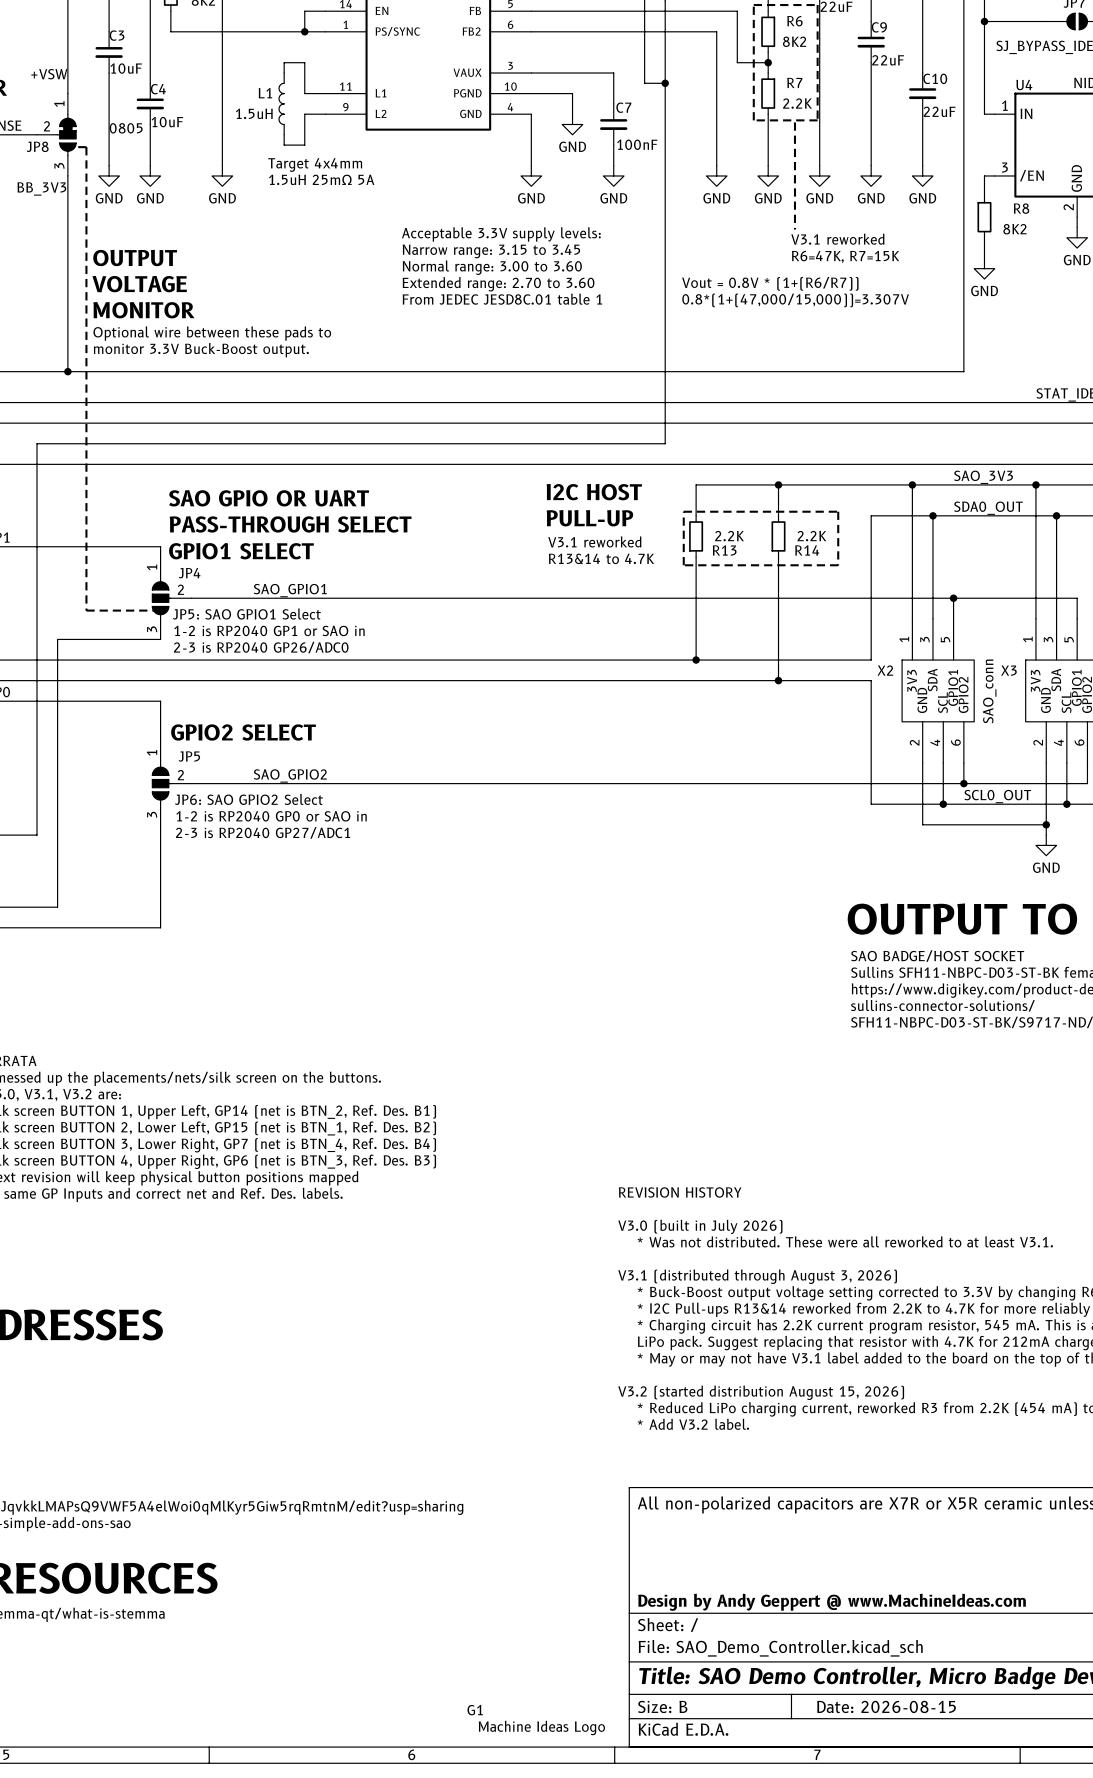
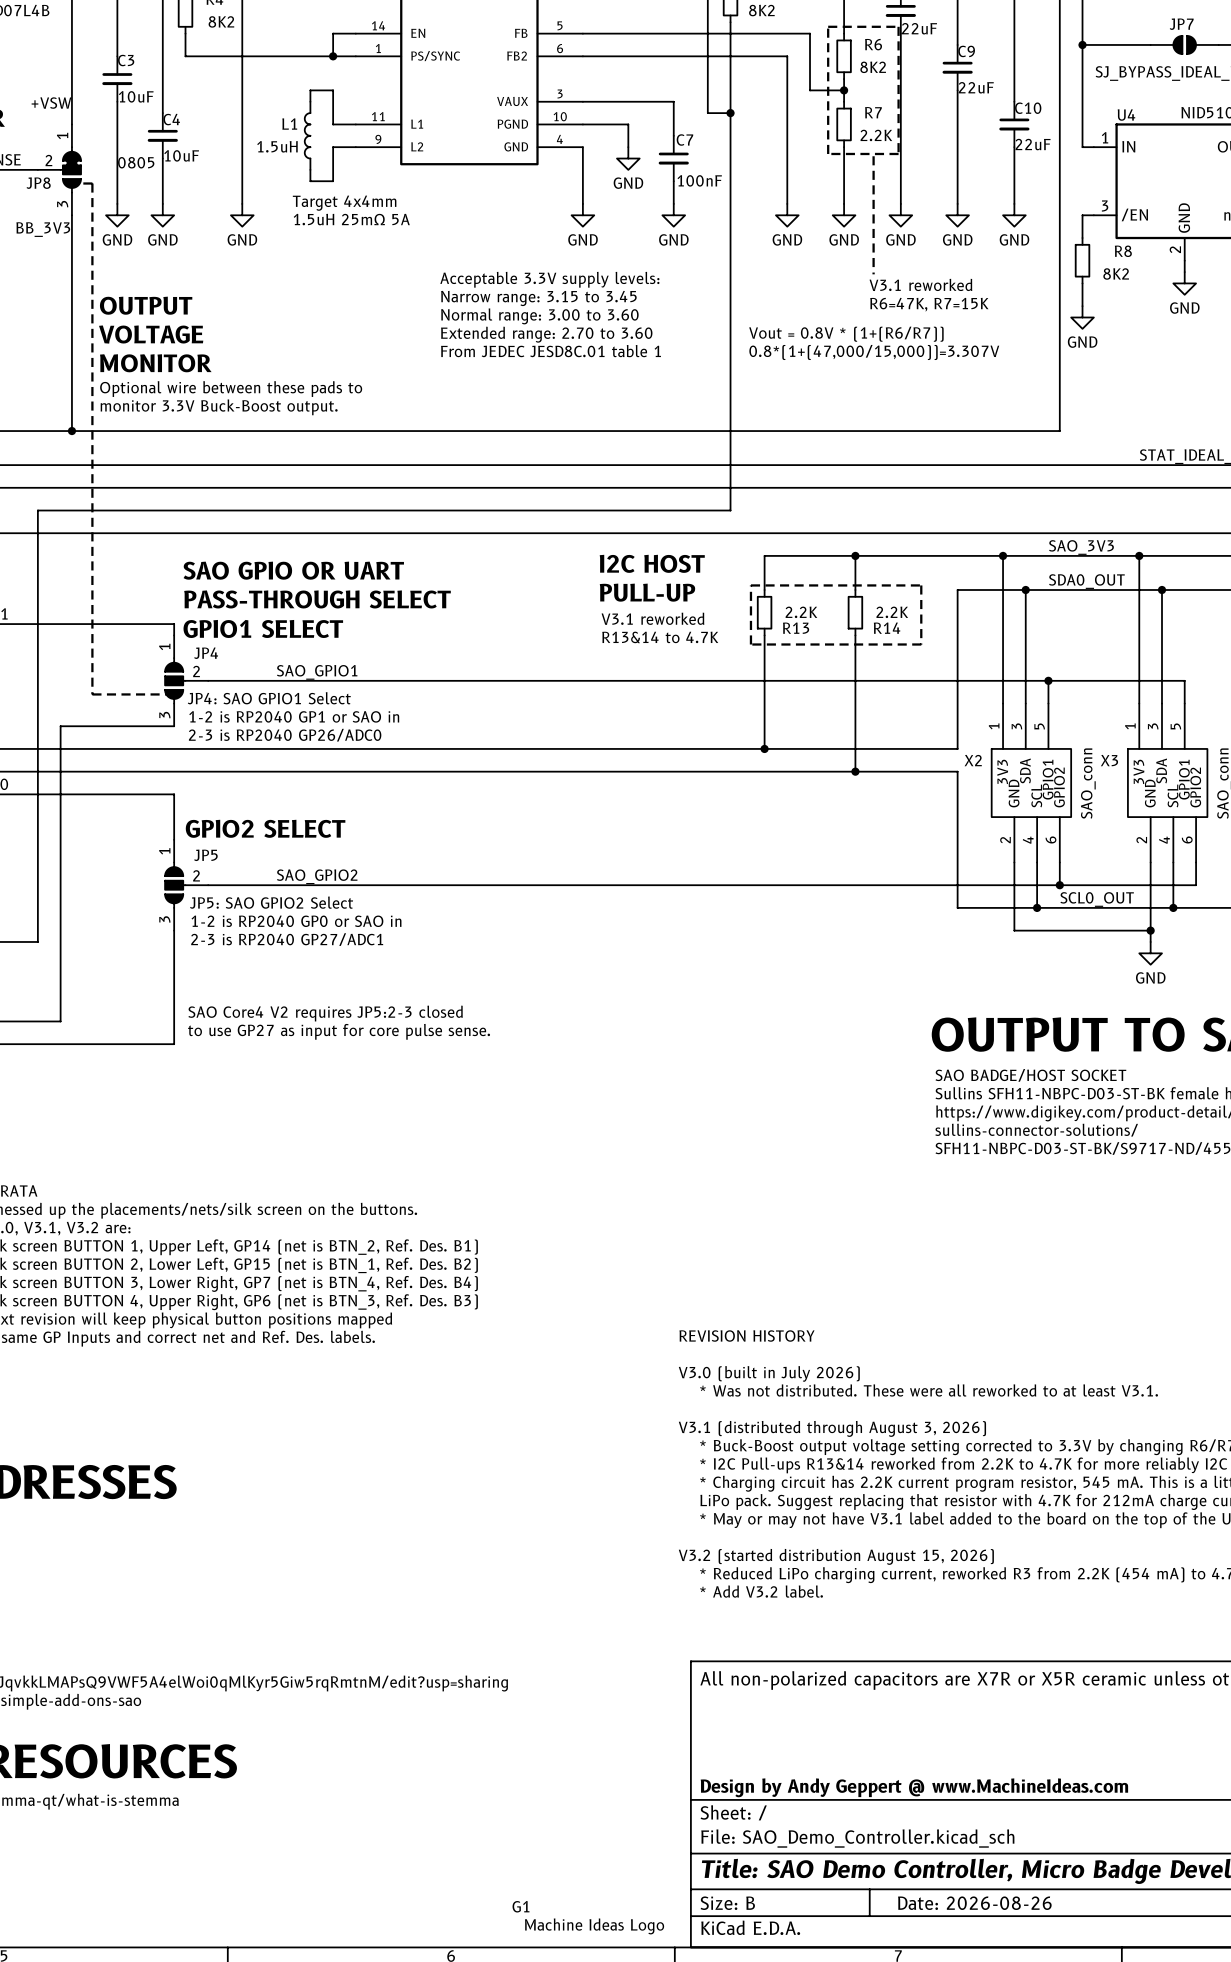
text: JP5: SAO GPIO1 Select (246, 614) -> JP4: SAO GPIO1 Select (269, 698)
text: JP6: SAO GPIO2 Select (248, 799) -> JP5: SAO GPIO2 Select (271, 902)
text: none -> SAO Core4 V2 requires JP5:2-3 closed (325, 1013)
text: none -> to use GP27 as input for core pulse sense. (339, 1031)
title block: Date: 2026-08-15 (886, 1706) -> Date: 2026-08-26 (974, 1903)

